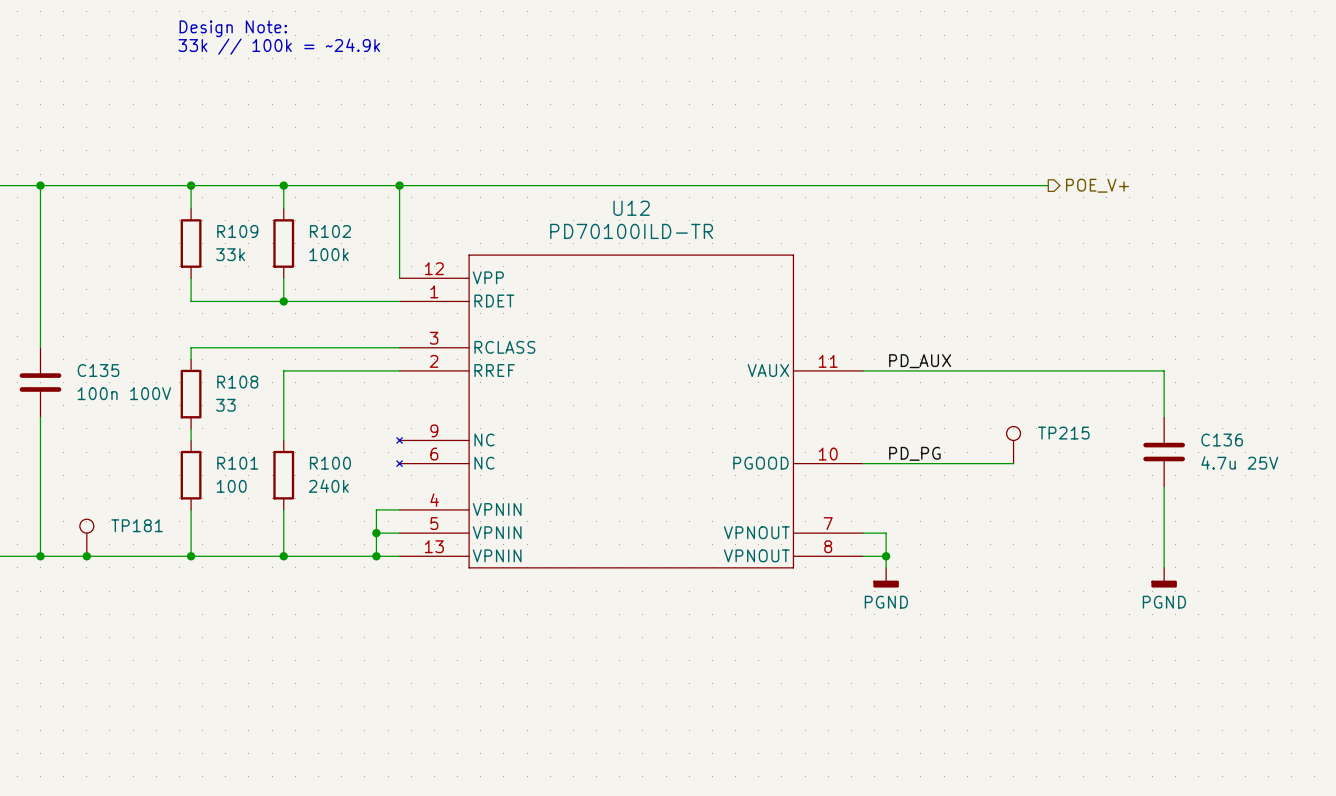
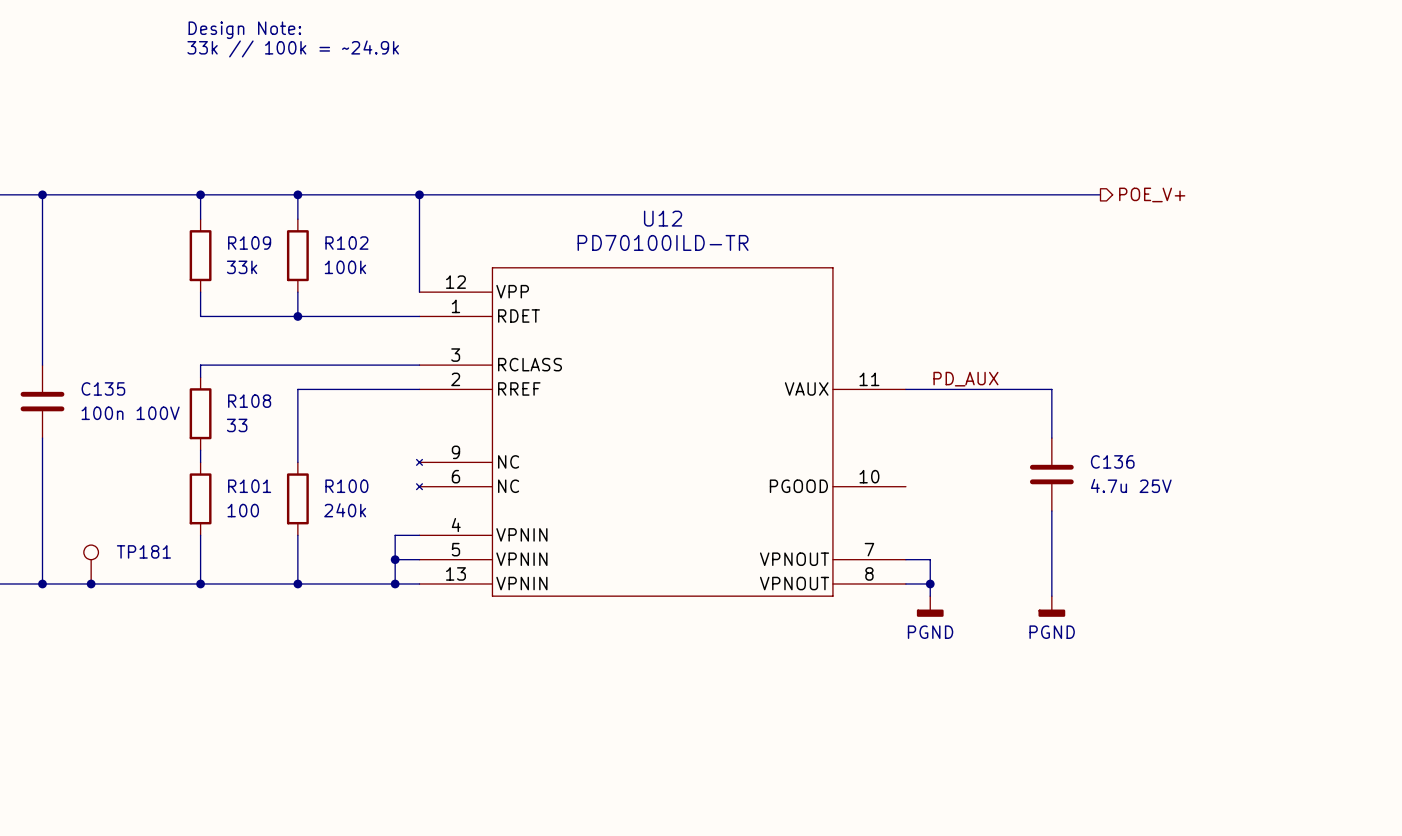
wire: (1001, 370) (1164, 370) (1164, 417) -> (1051, 389) (1051, 438)
TP215: (1013, 445) -> none
C136 position: (1164, 452) -> (1051, 474)
label: PD_PG (914, 453) -> none
wire: (862, 463) (1013, 463) -> none
wire: (1164, 486) (1164, 567) -> (1051, 511) (1051, 596)
power symbol position: PGND (1164, 577) -> PGND (1051, 606)

